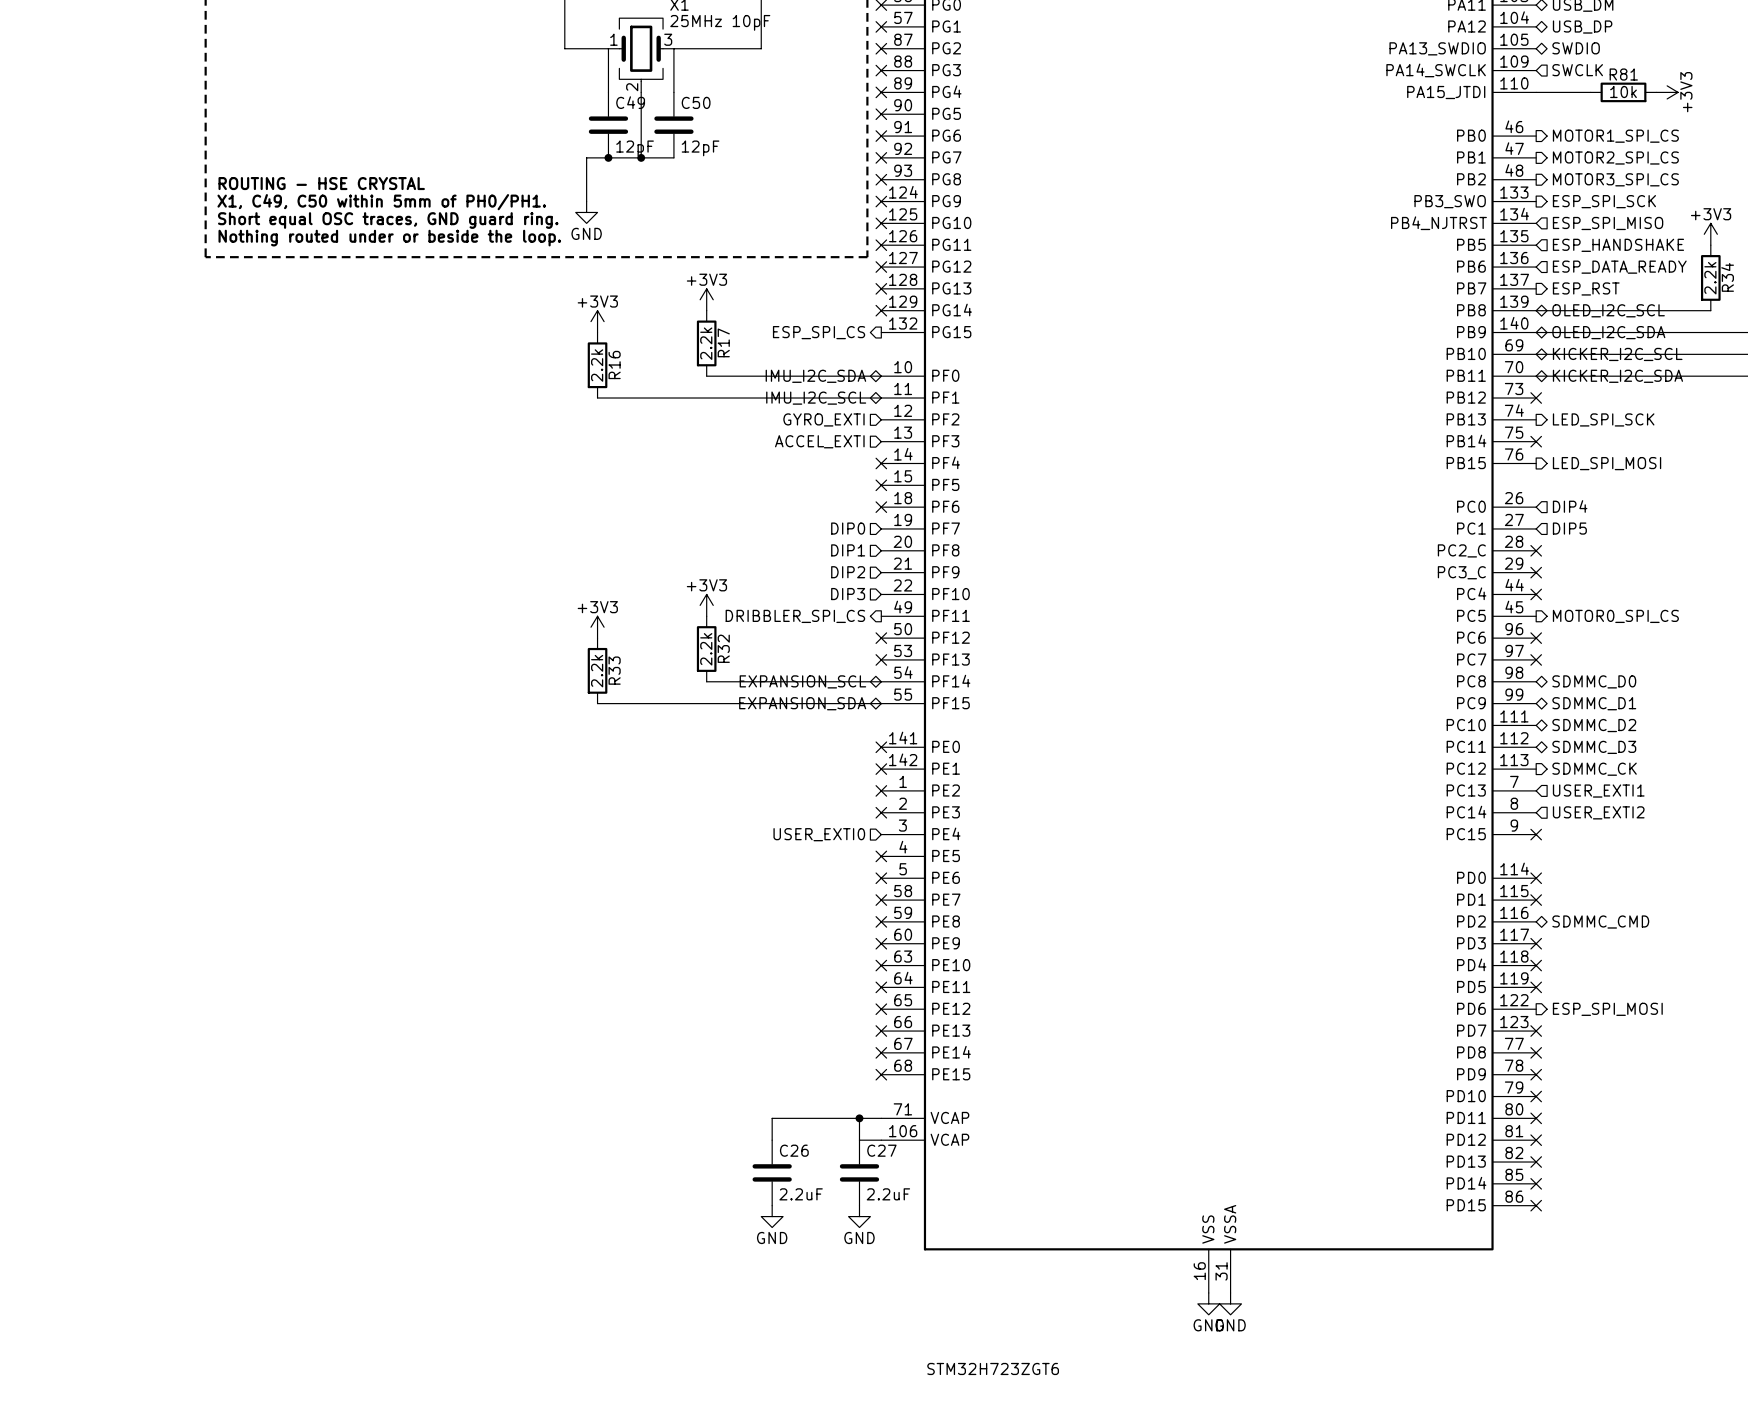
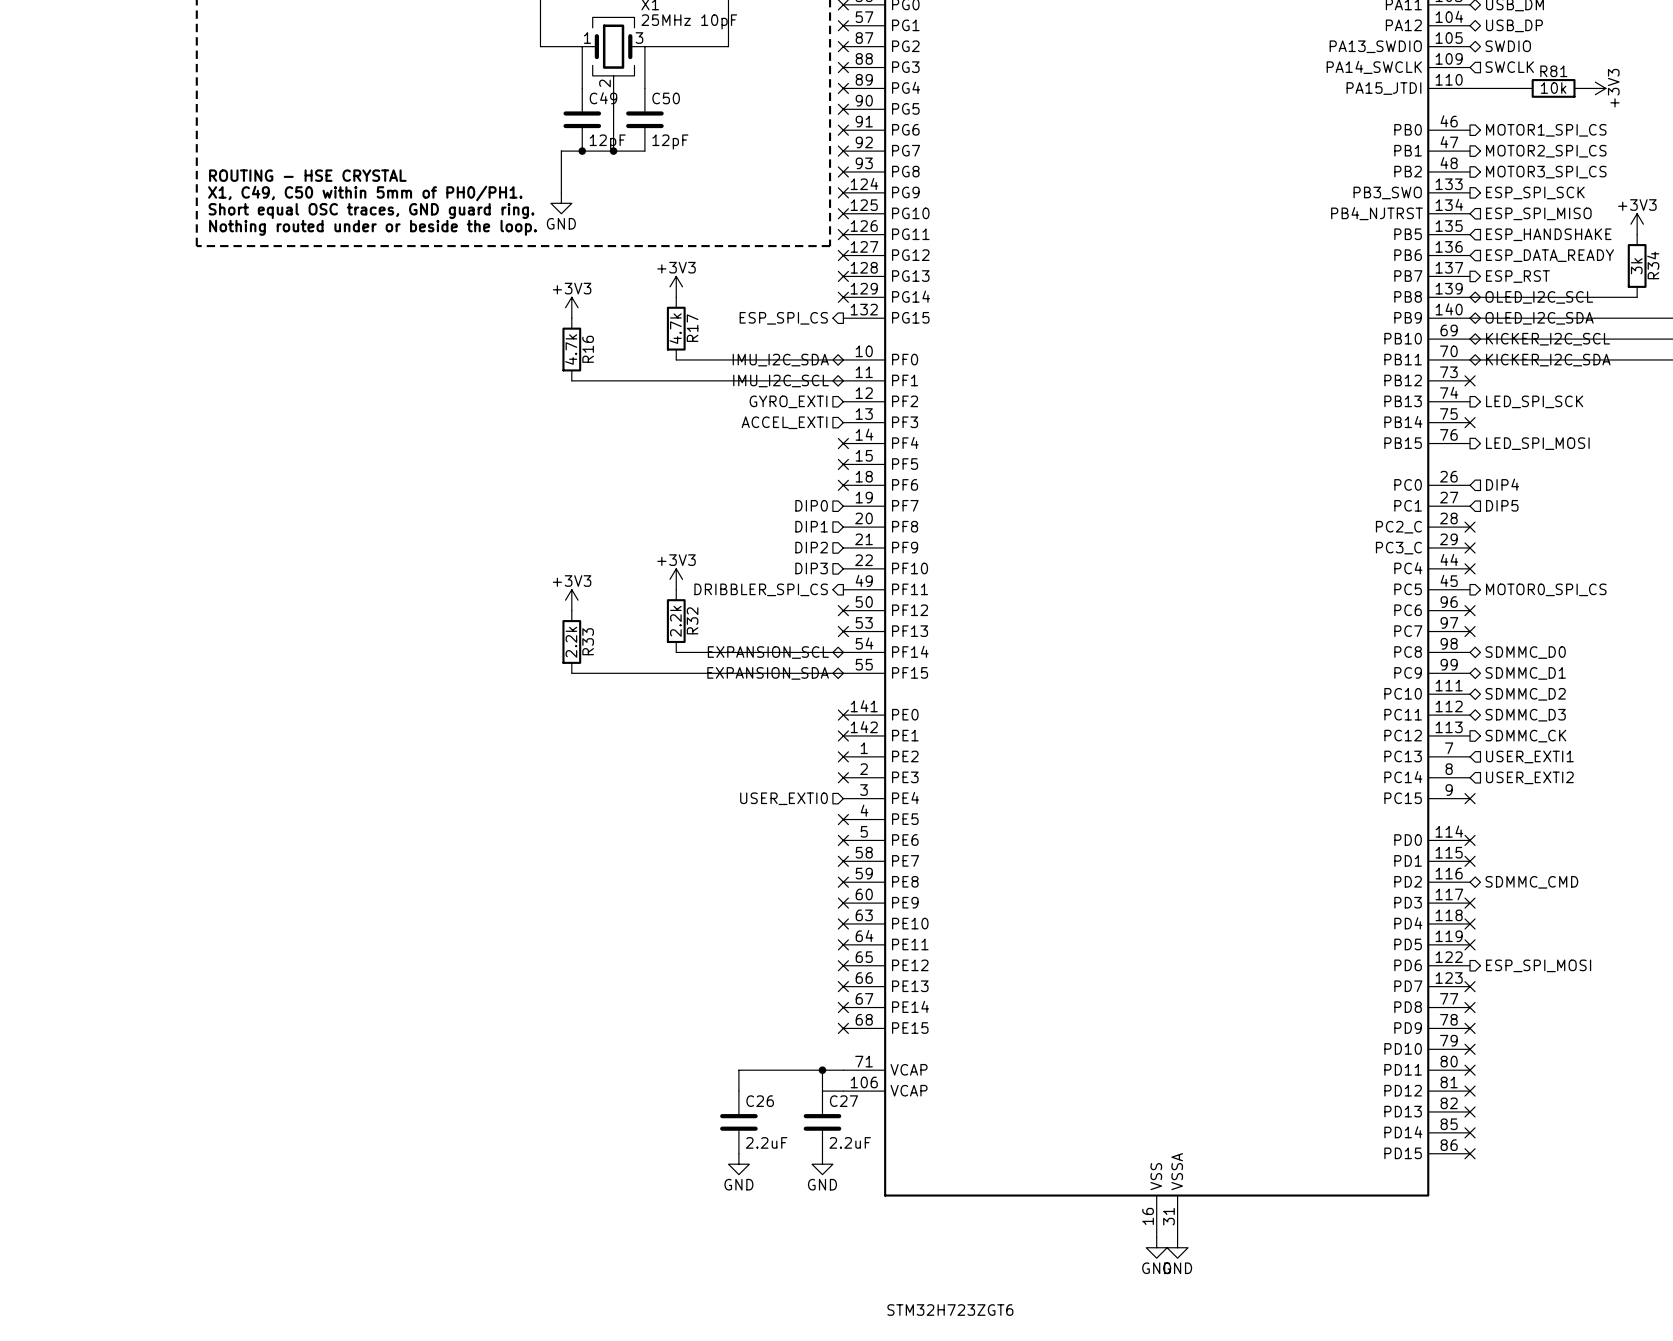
R34 value: 2.2k (1710, 278) -> 3k (1636, 266)
R17 value: 2.2k (706, 343) -> 4.7k (675, 328)
R16 value: 2.2k (597, 365) -> 4.7k (571, 349)

